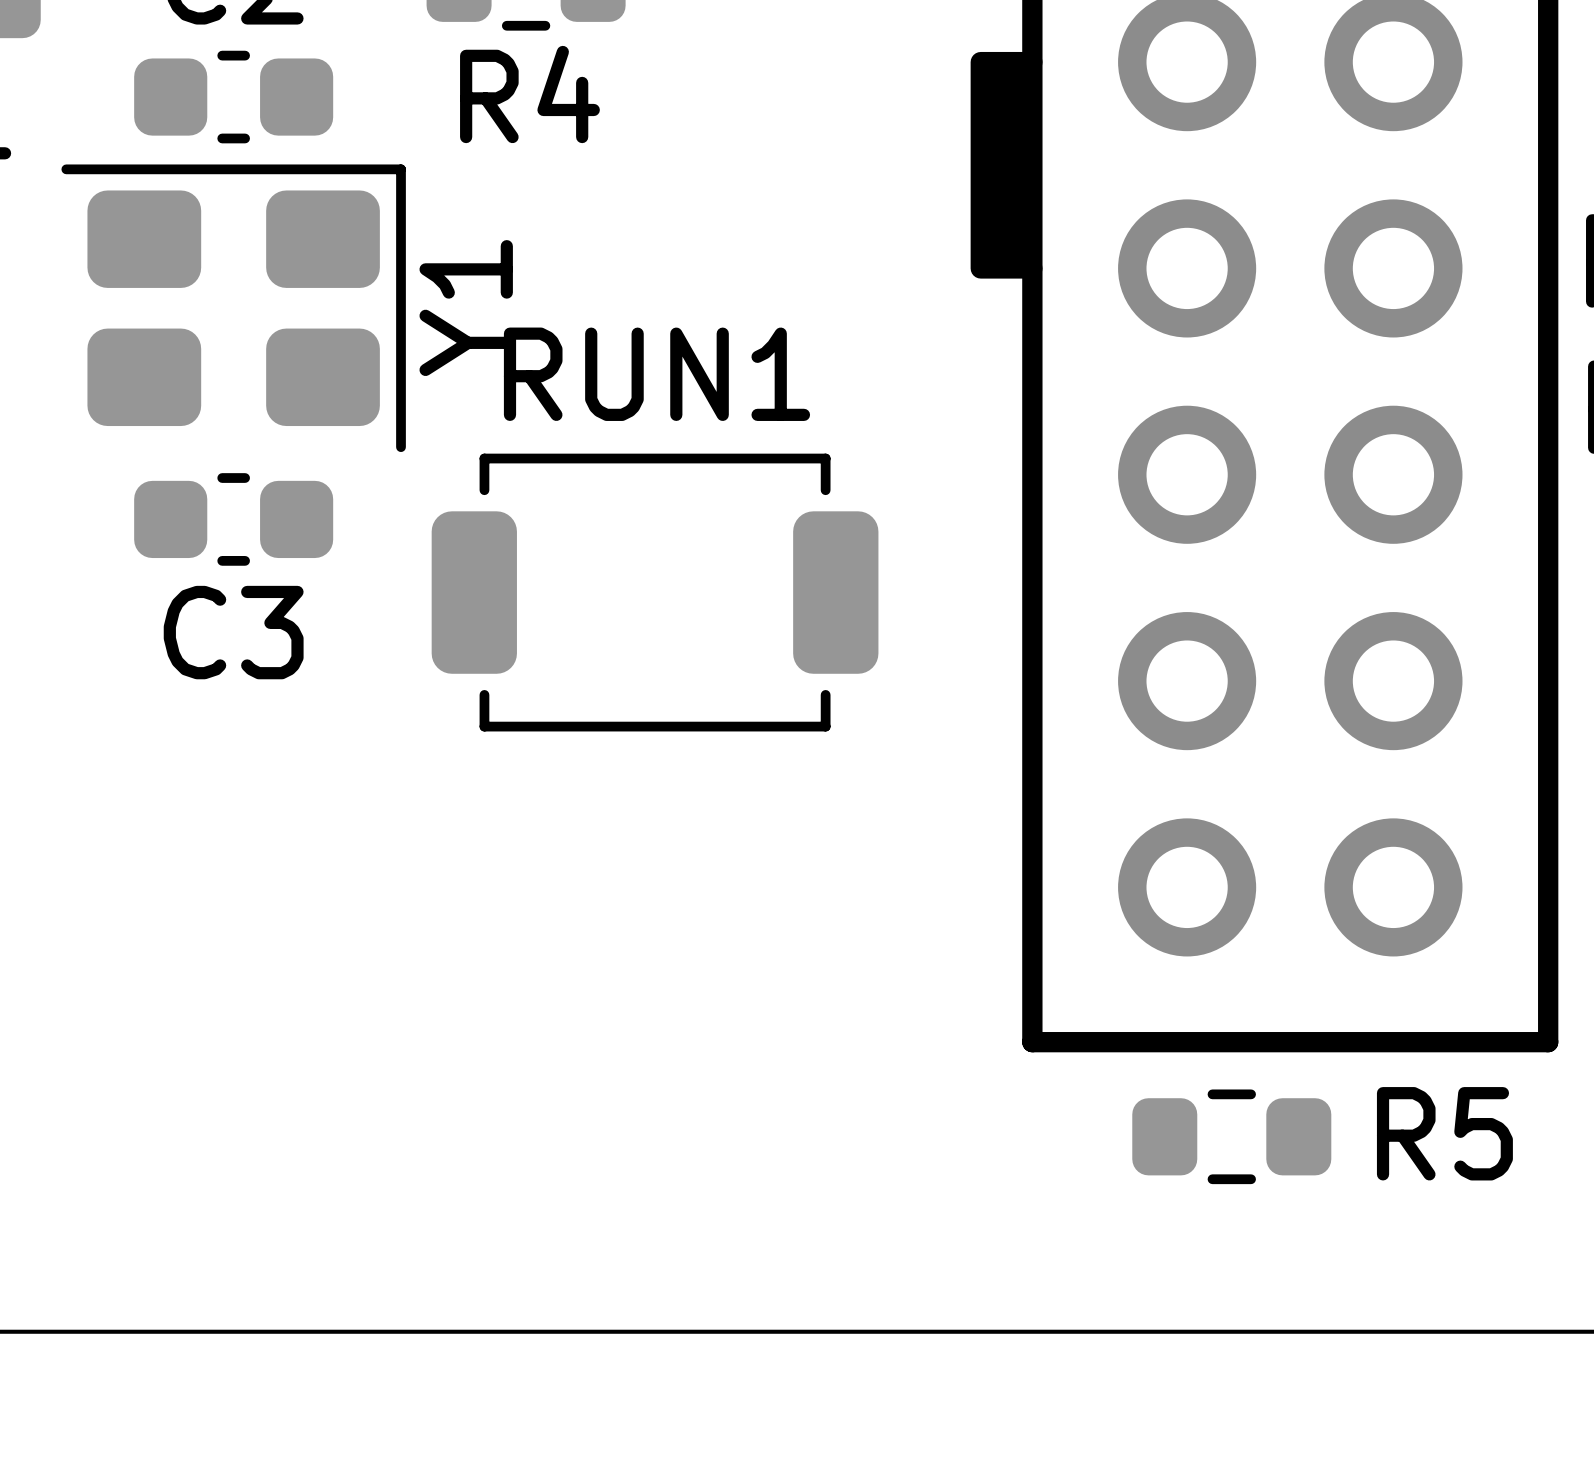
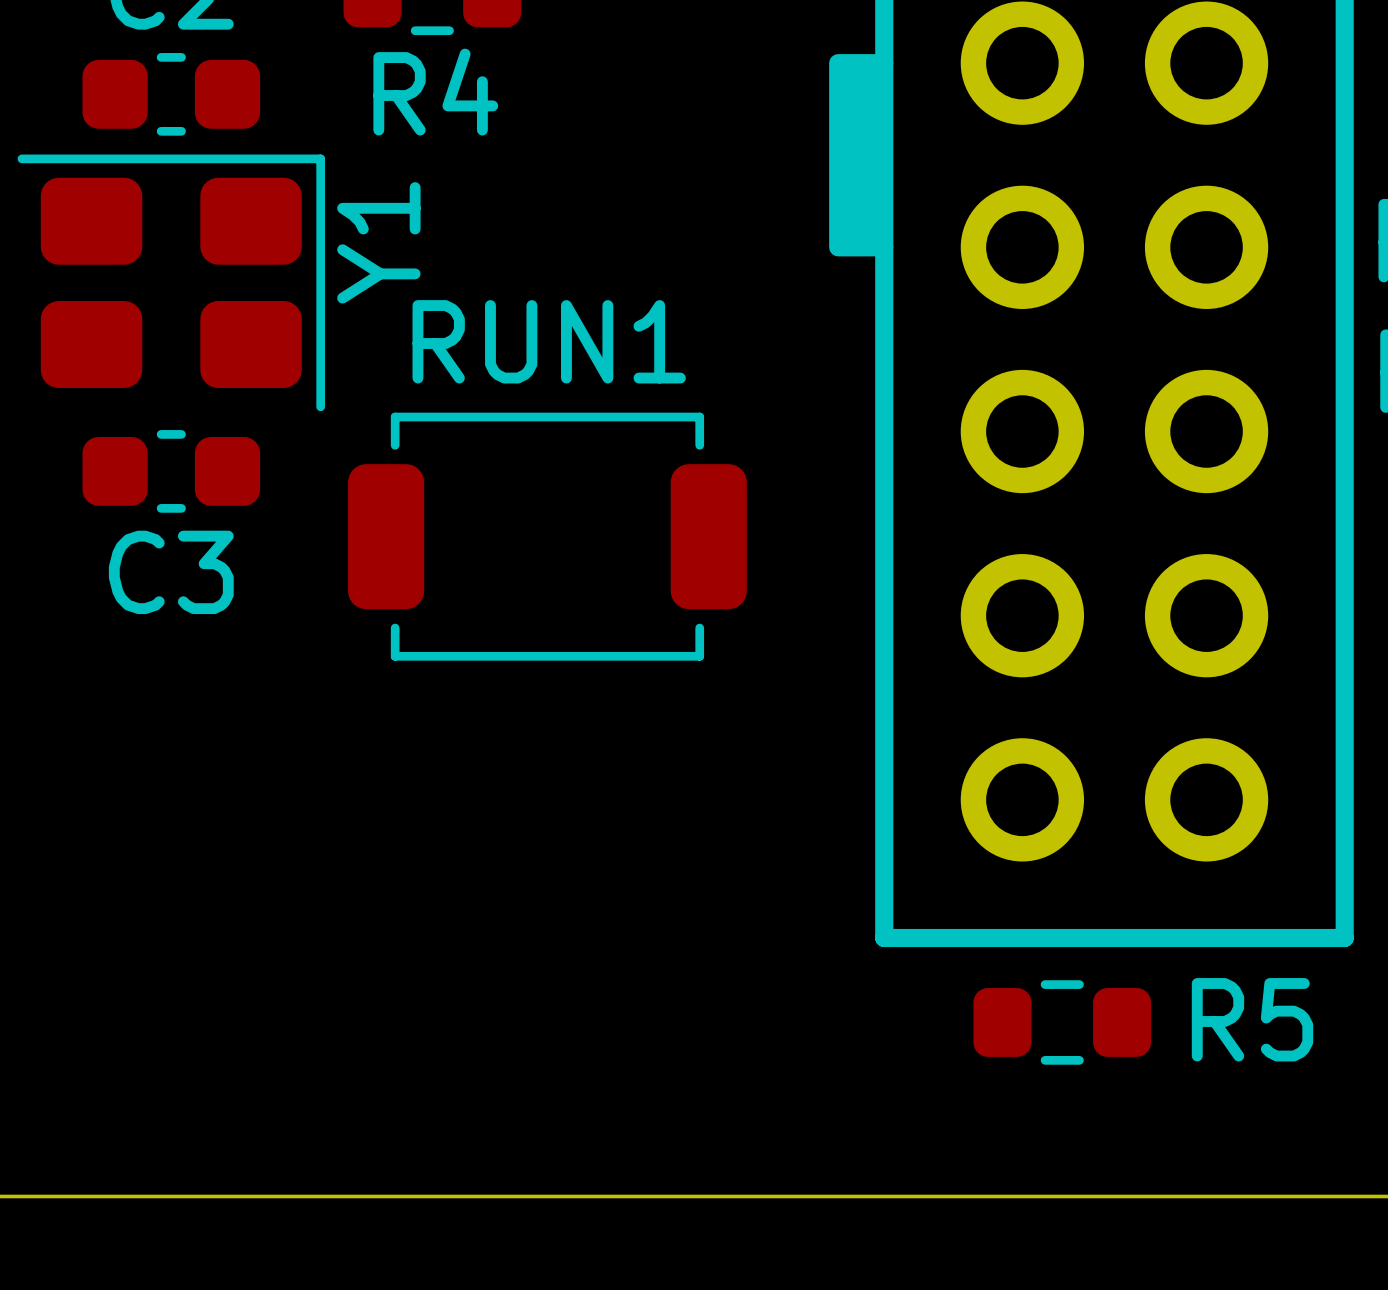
Y1 name position: Y1 (466, 308) -> Y1 (378, 242)

